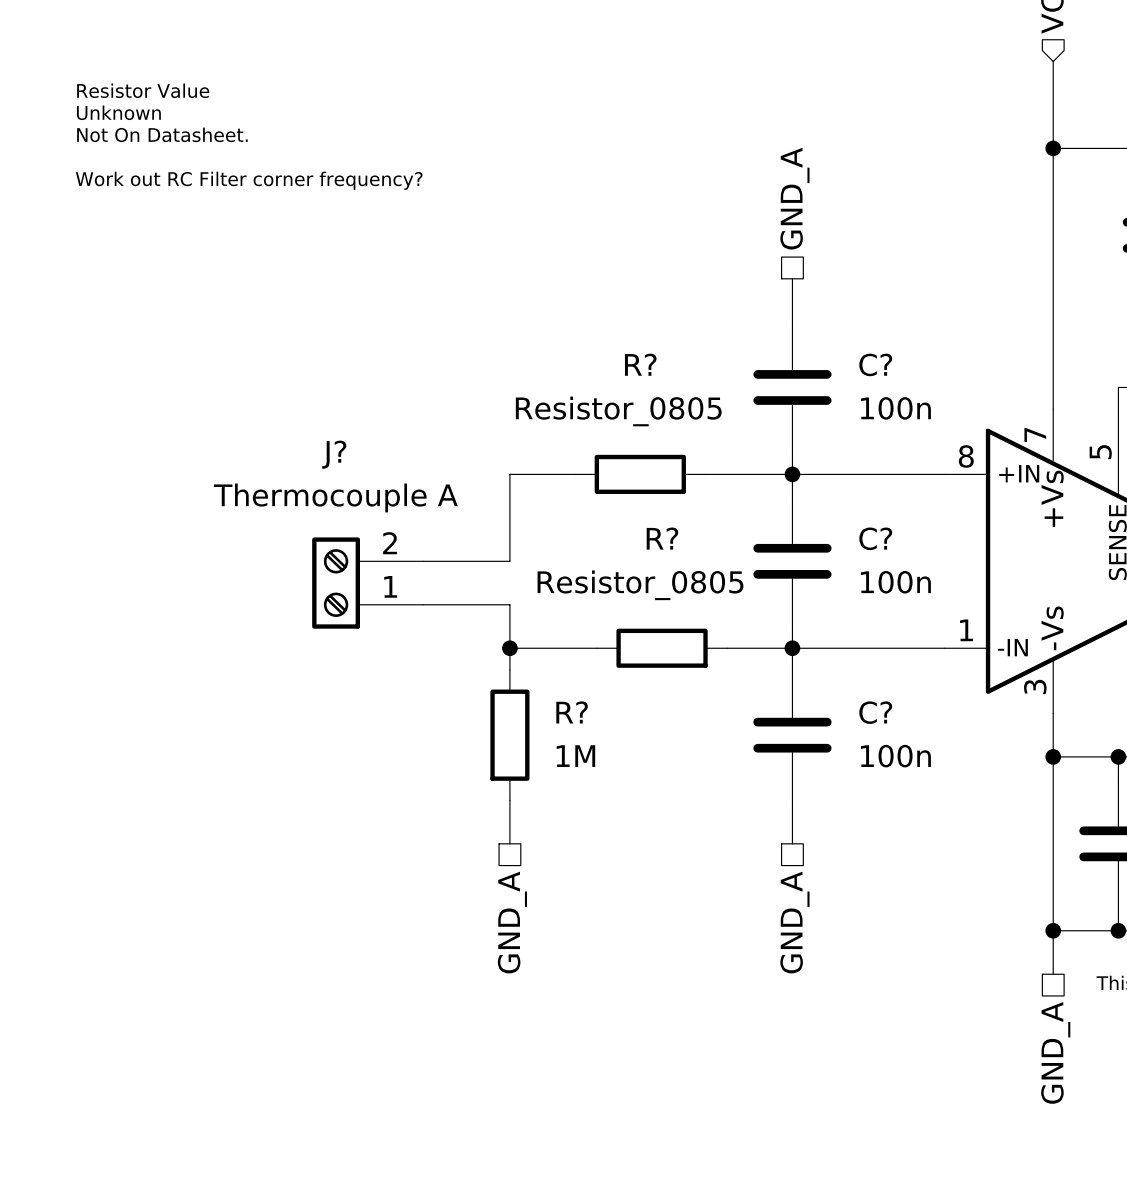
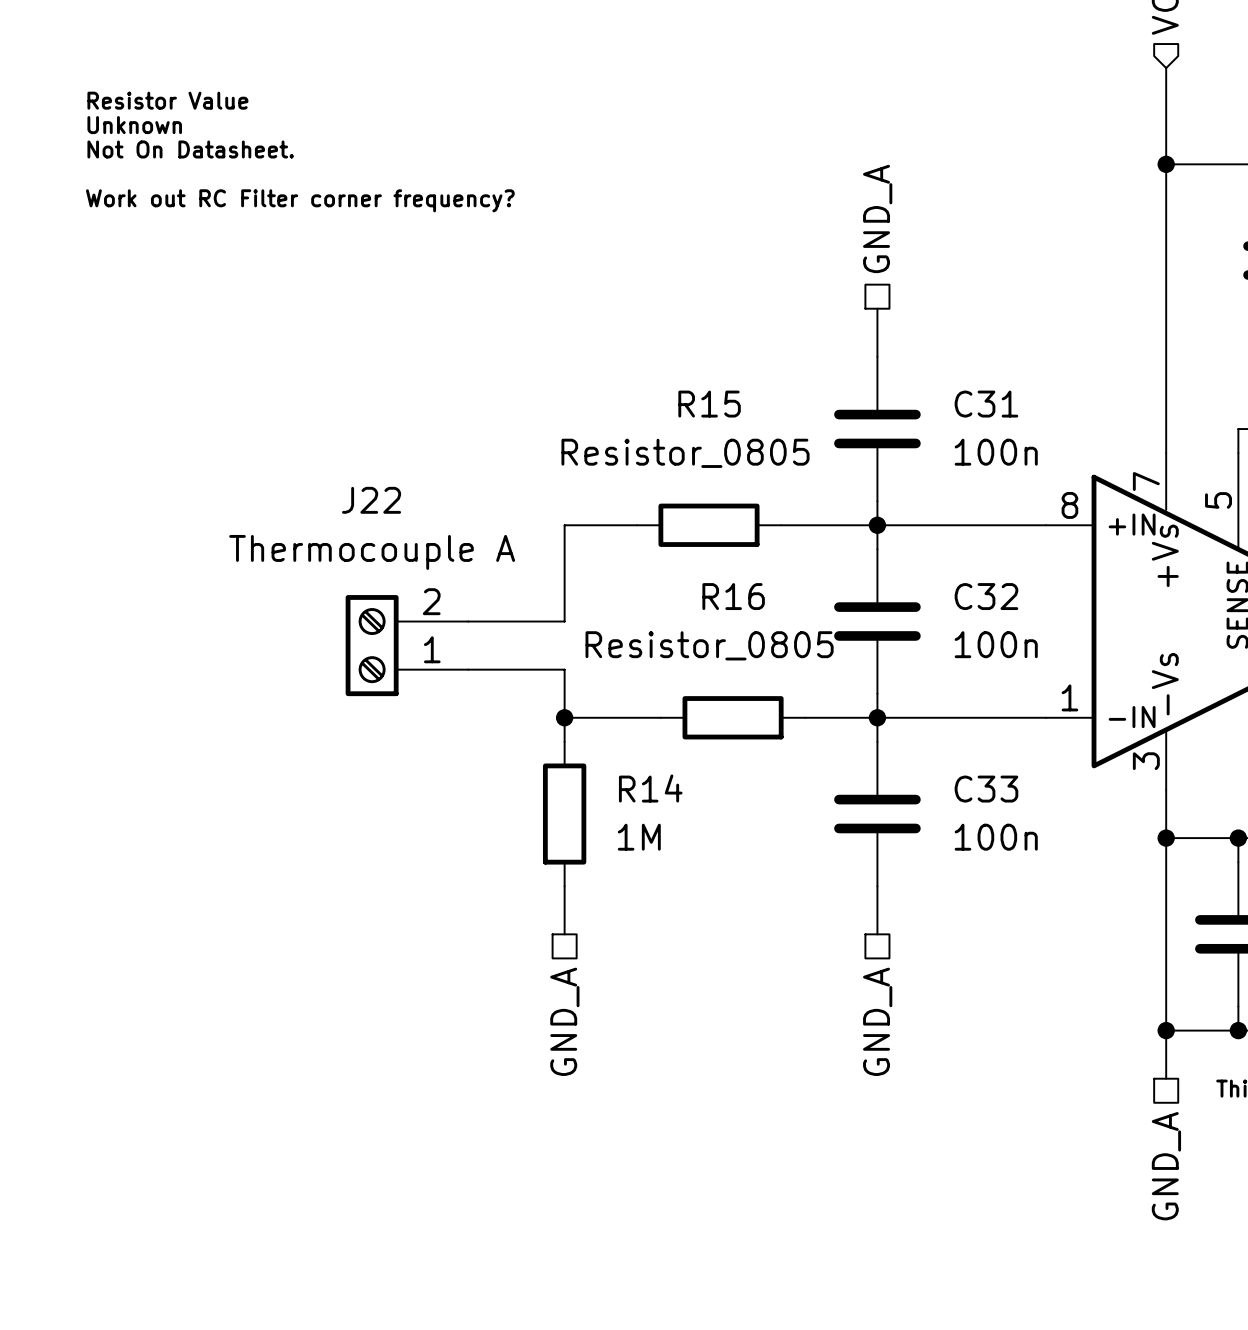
R? name: R? (640, 364) -> R15 (709, 404)
C? name: C? (875, 364) -> C31 (986, 404)
J? name: J? (334, 454) -> J22 (371, 500)
R? name: R? (662, 538) -> R16 (733, 596)
C? name: C? (875, 538) -> C32 (986, 596)
R? name: R? (572, 712) -> R14 (650, 788)
C? name: C? (875, 712) -> C33 (986, 789)

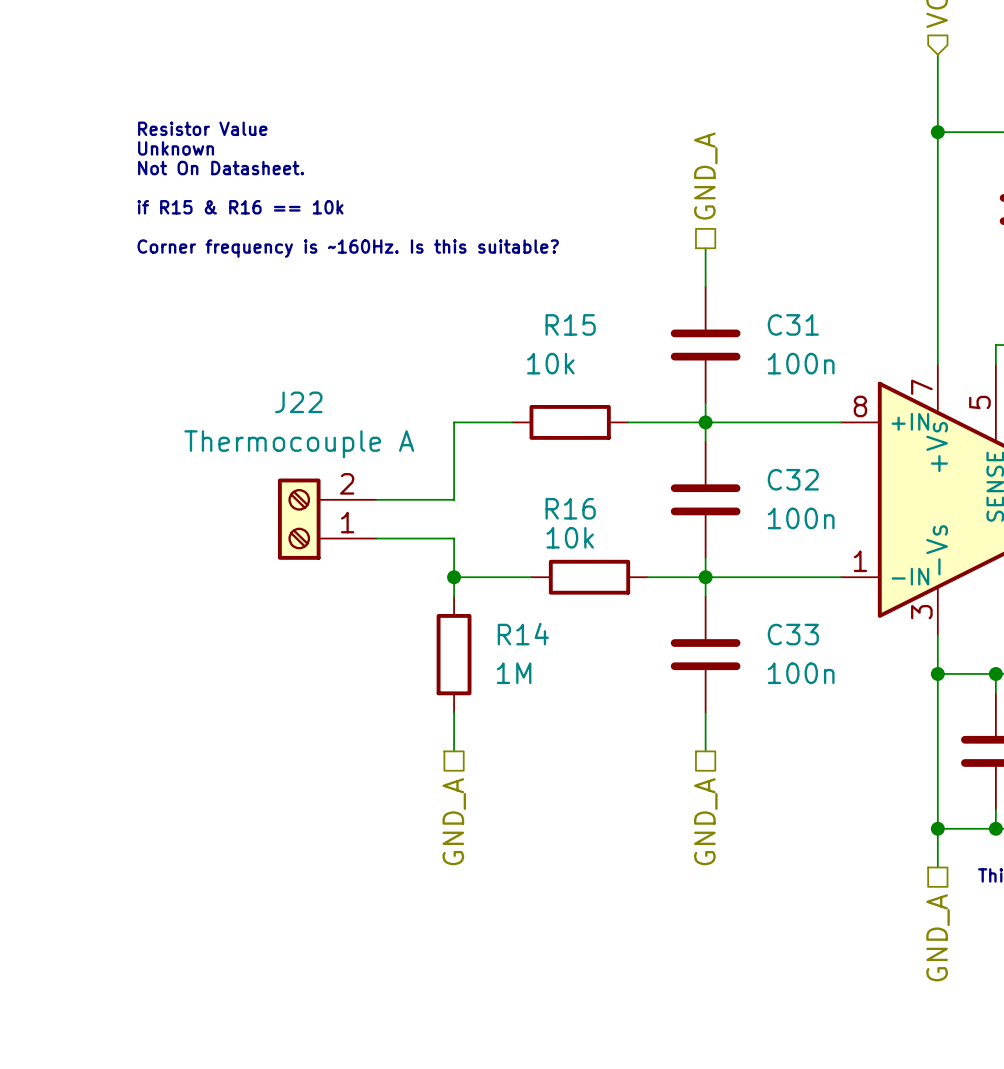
text position: Resistor Value (167, 100) -> Resistor Value (202, 128)
text position: Unknown (134, 125) -> Unknown (176, 148)
text position: Not On Datasheet. (190, 149) -> Not On Datasheet. (221, 168)
text: Work out RC Filter corner frequency? (300, 200) -> none
text: none -> if R15 & R16 == 10k (240, 207)
text: none -> Corner frequency is ~160Hz. Is this suitable? (348, 248)
R15 value: Resistor_0805 (685, 453) -> 10k (550, 363)
R16 name position: R16 (733, 596) -> R16 (570, 508)
R16 value: Resistor_0805 (709, 645) -> 10k (570, 537)

